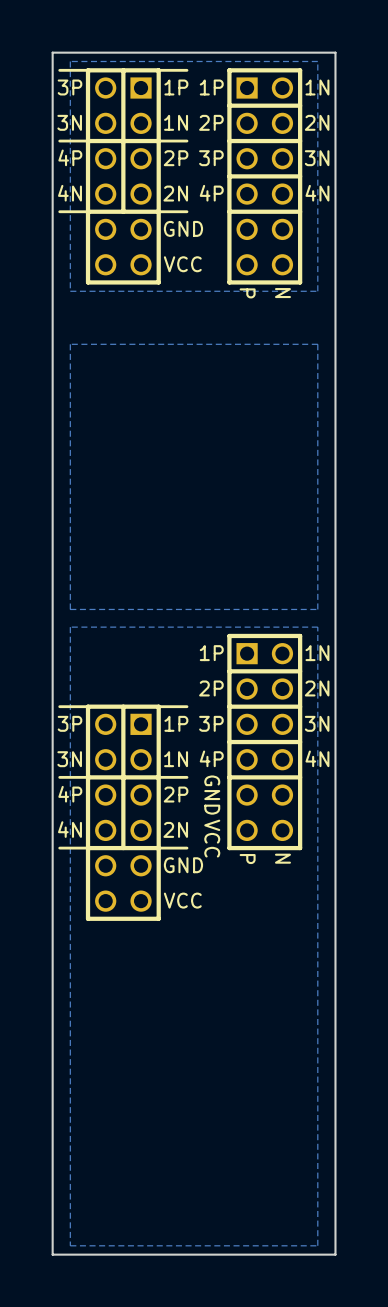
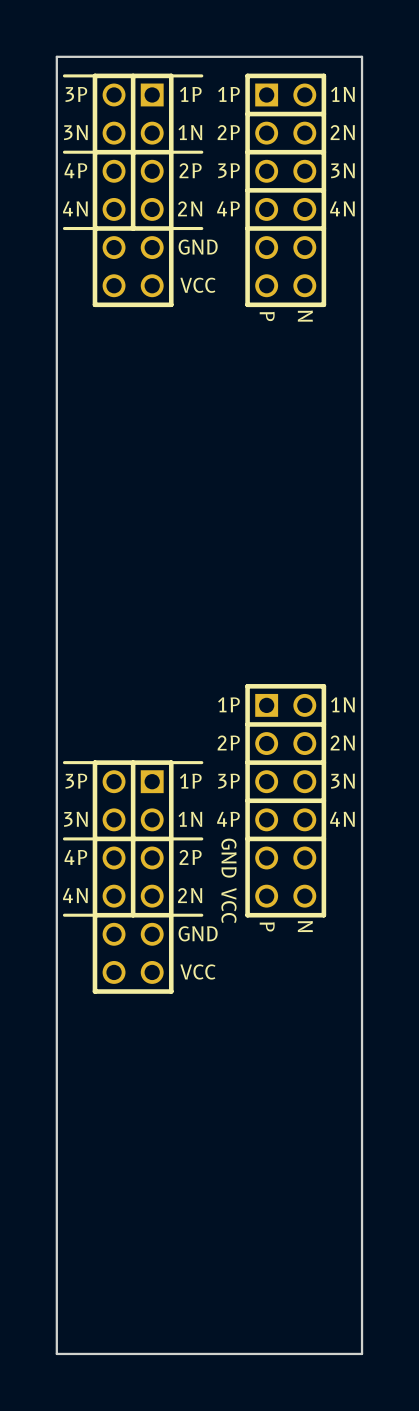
zone outline: (317, 61) (70, 61) (70, 291) (317, 291) (317, 61) -> none
zone outline: (317, 344) (317, 609) (70, 609) (70, 344) (317, 344) -> none
zone outline: (317, 627) (317, 1245) (70, 1245) (70, 627) (317, 627) -> none

